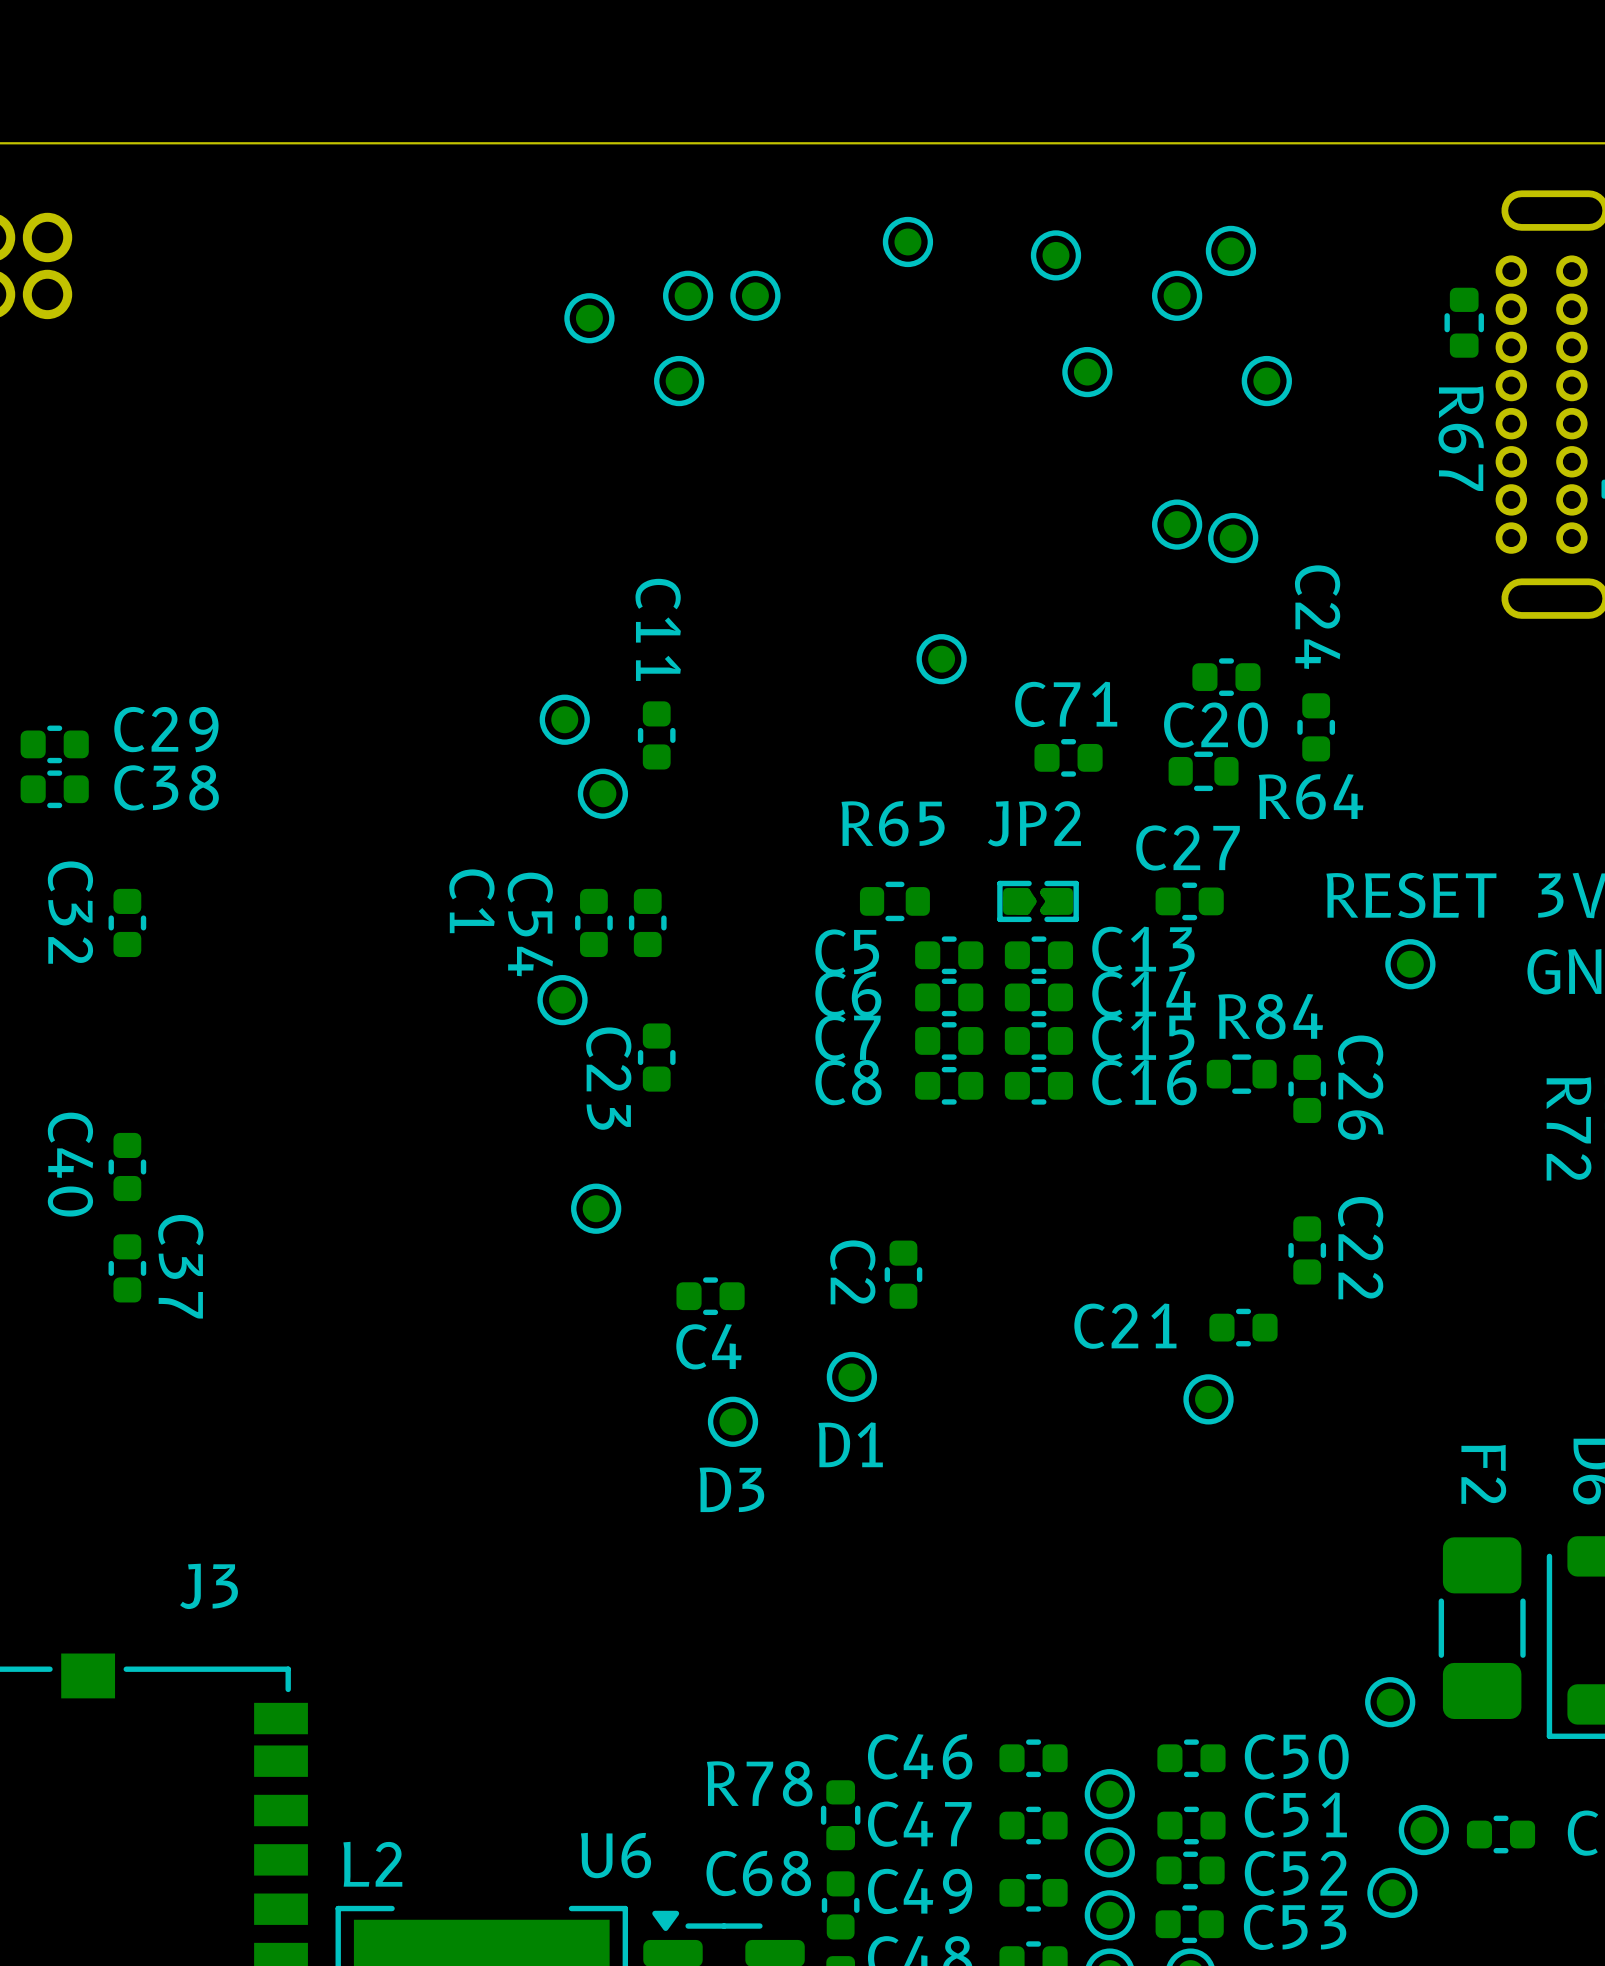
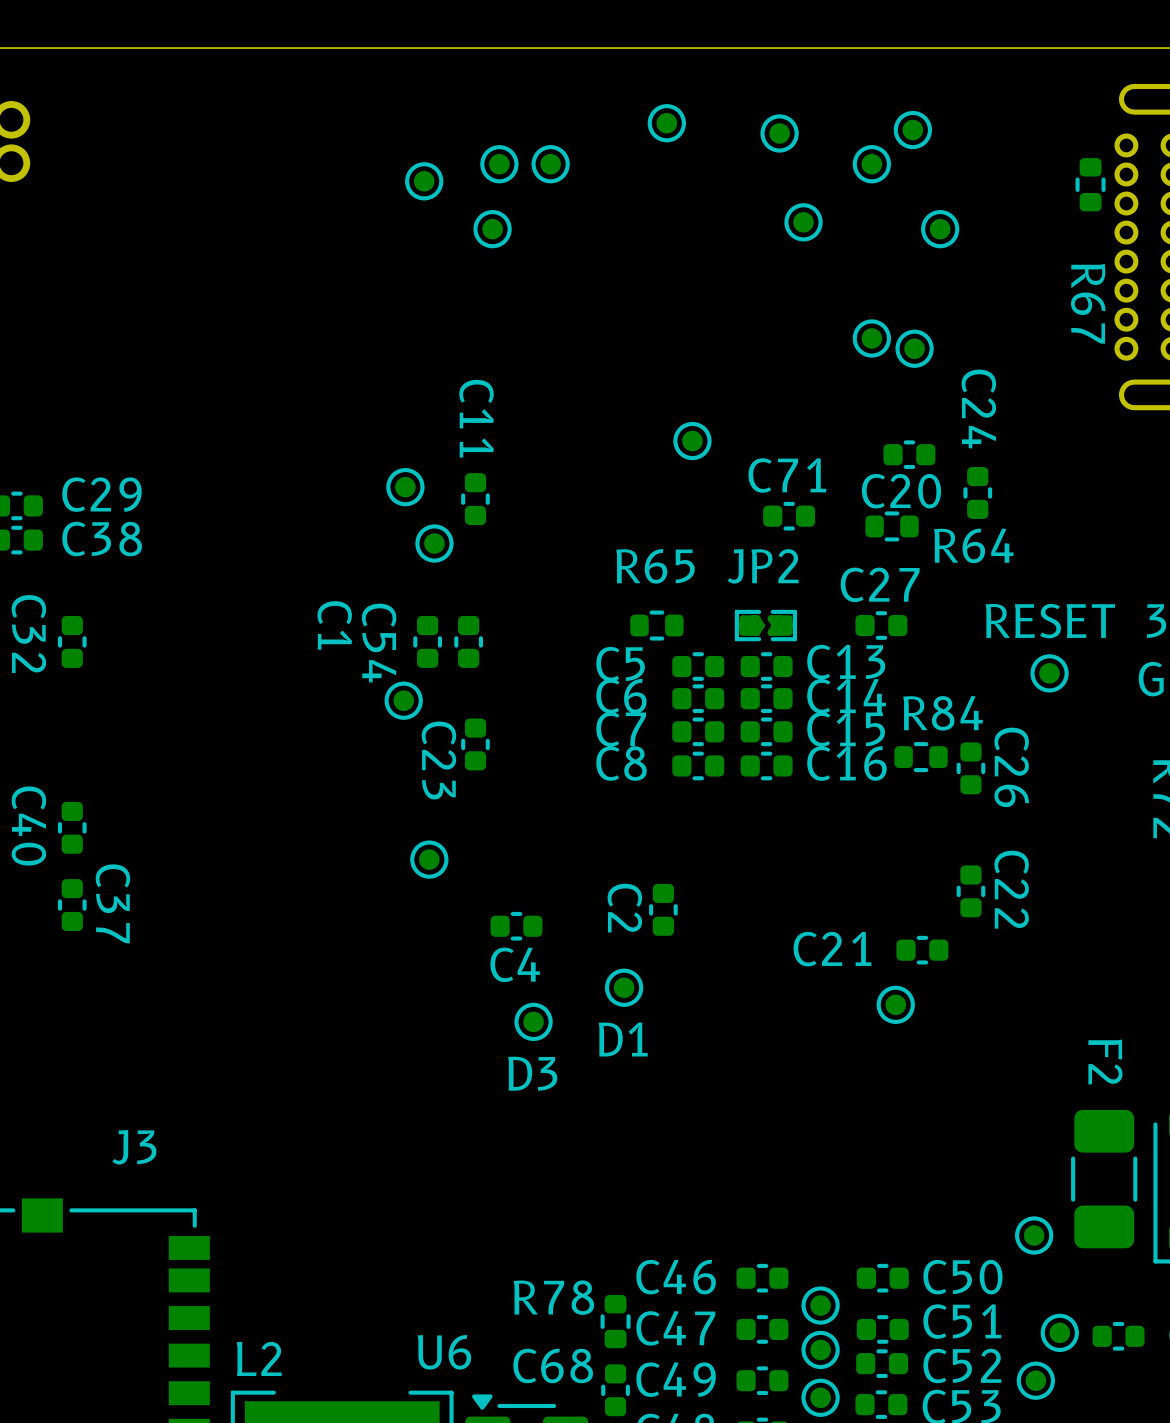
R67 name position: R67 (1461, 438) -> R67 (1088, 303)

